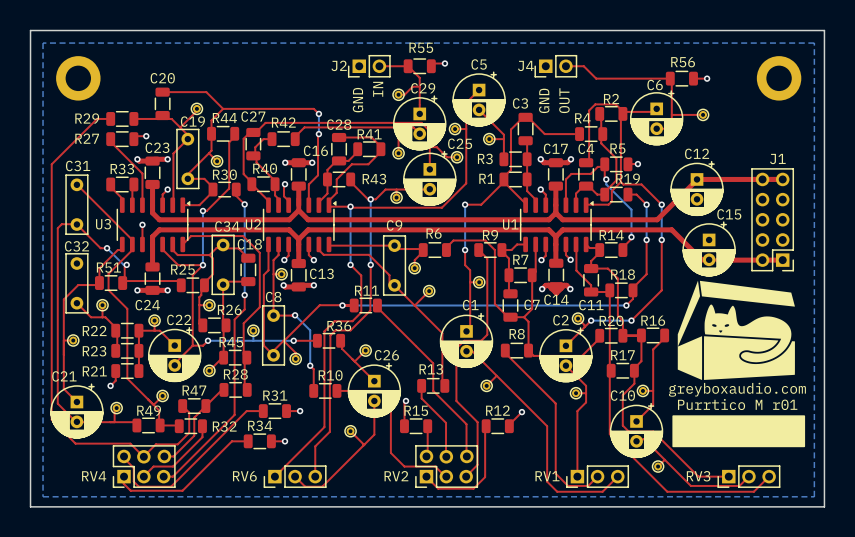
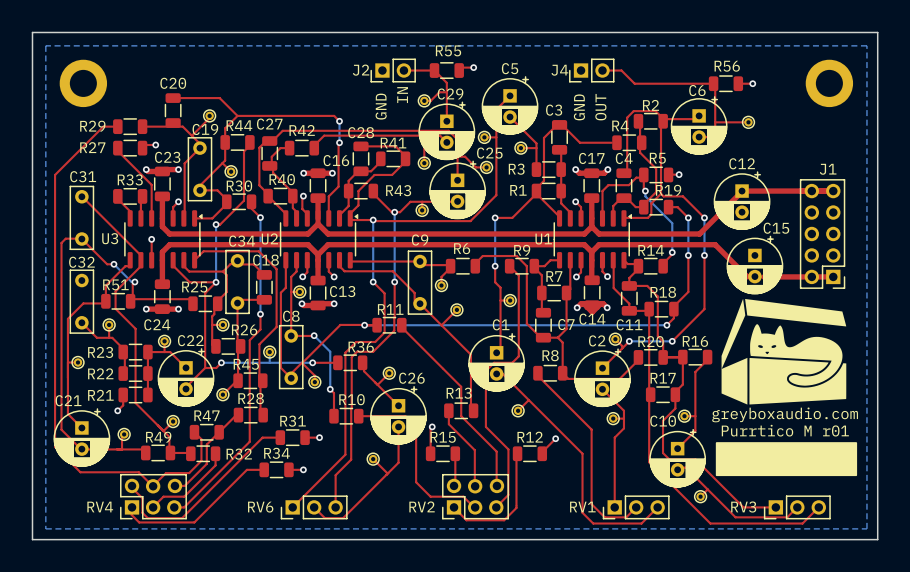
R22 name: R22 (94, 330) -> R23 (100, 352)
R23 name: R23 (94, 351) -> R22 (100, 373)

